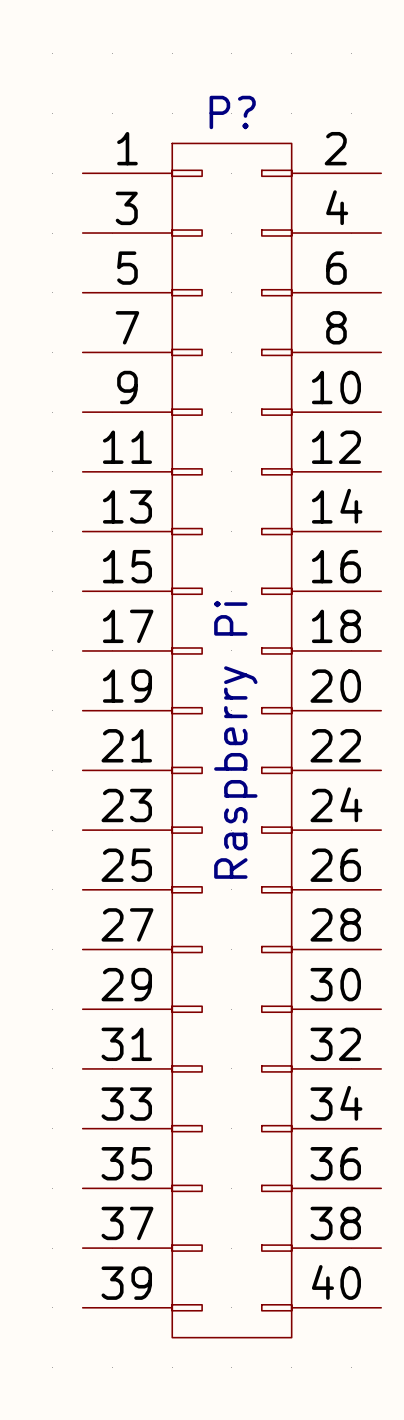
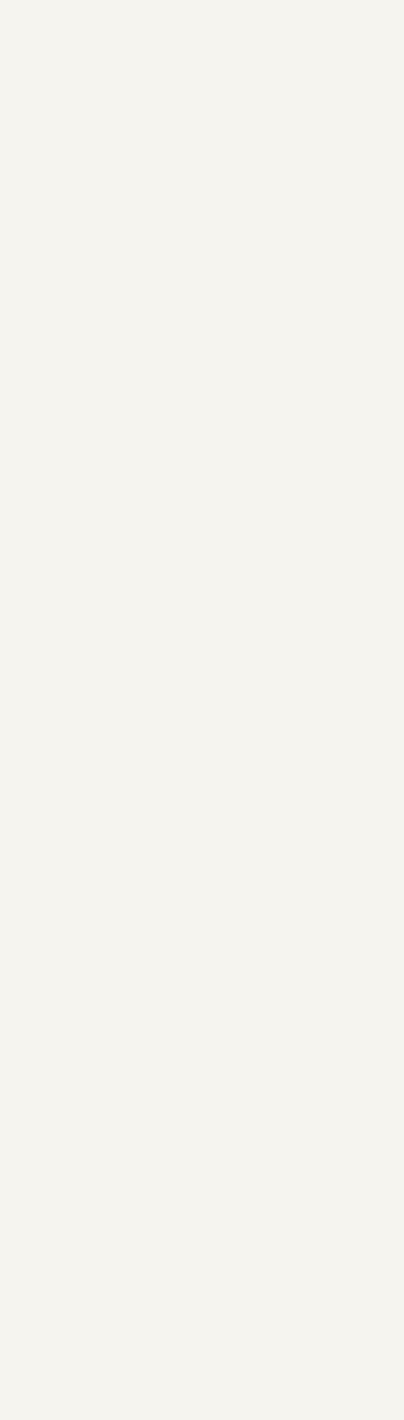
P?: Raspberry Pi (231, 740) -> none

